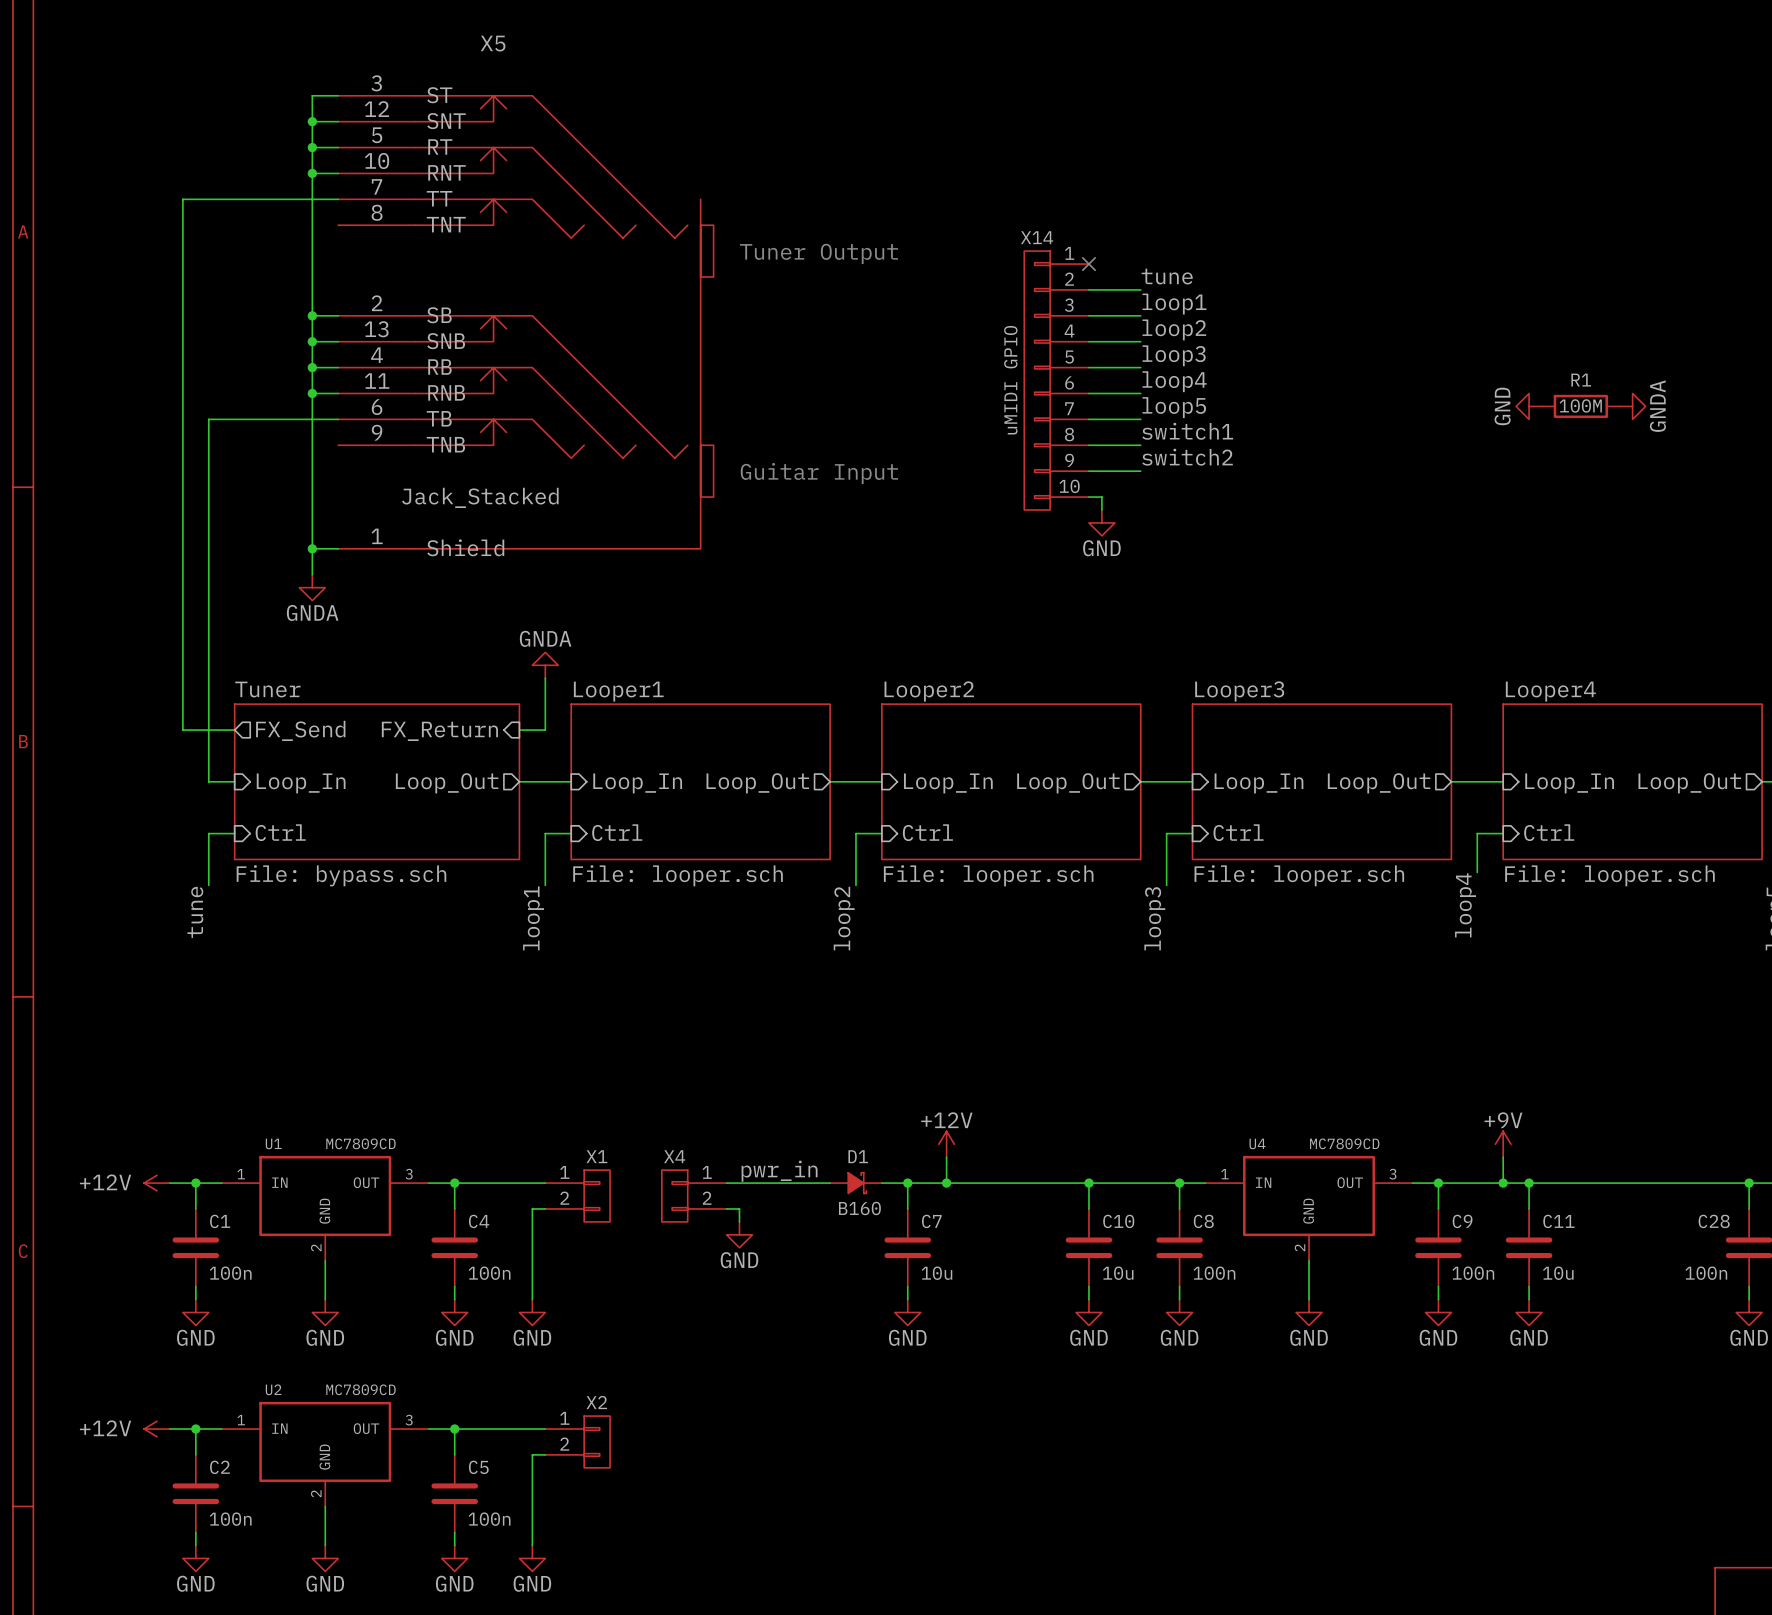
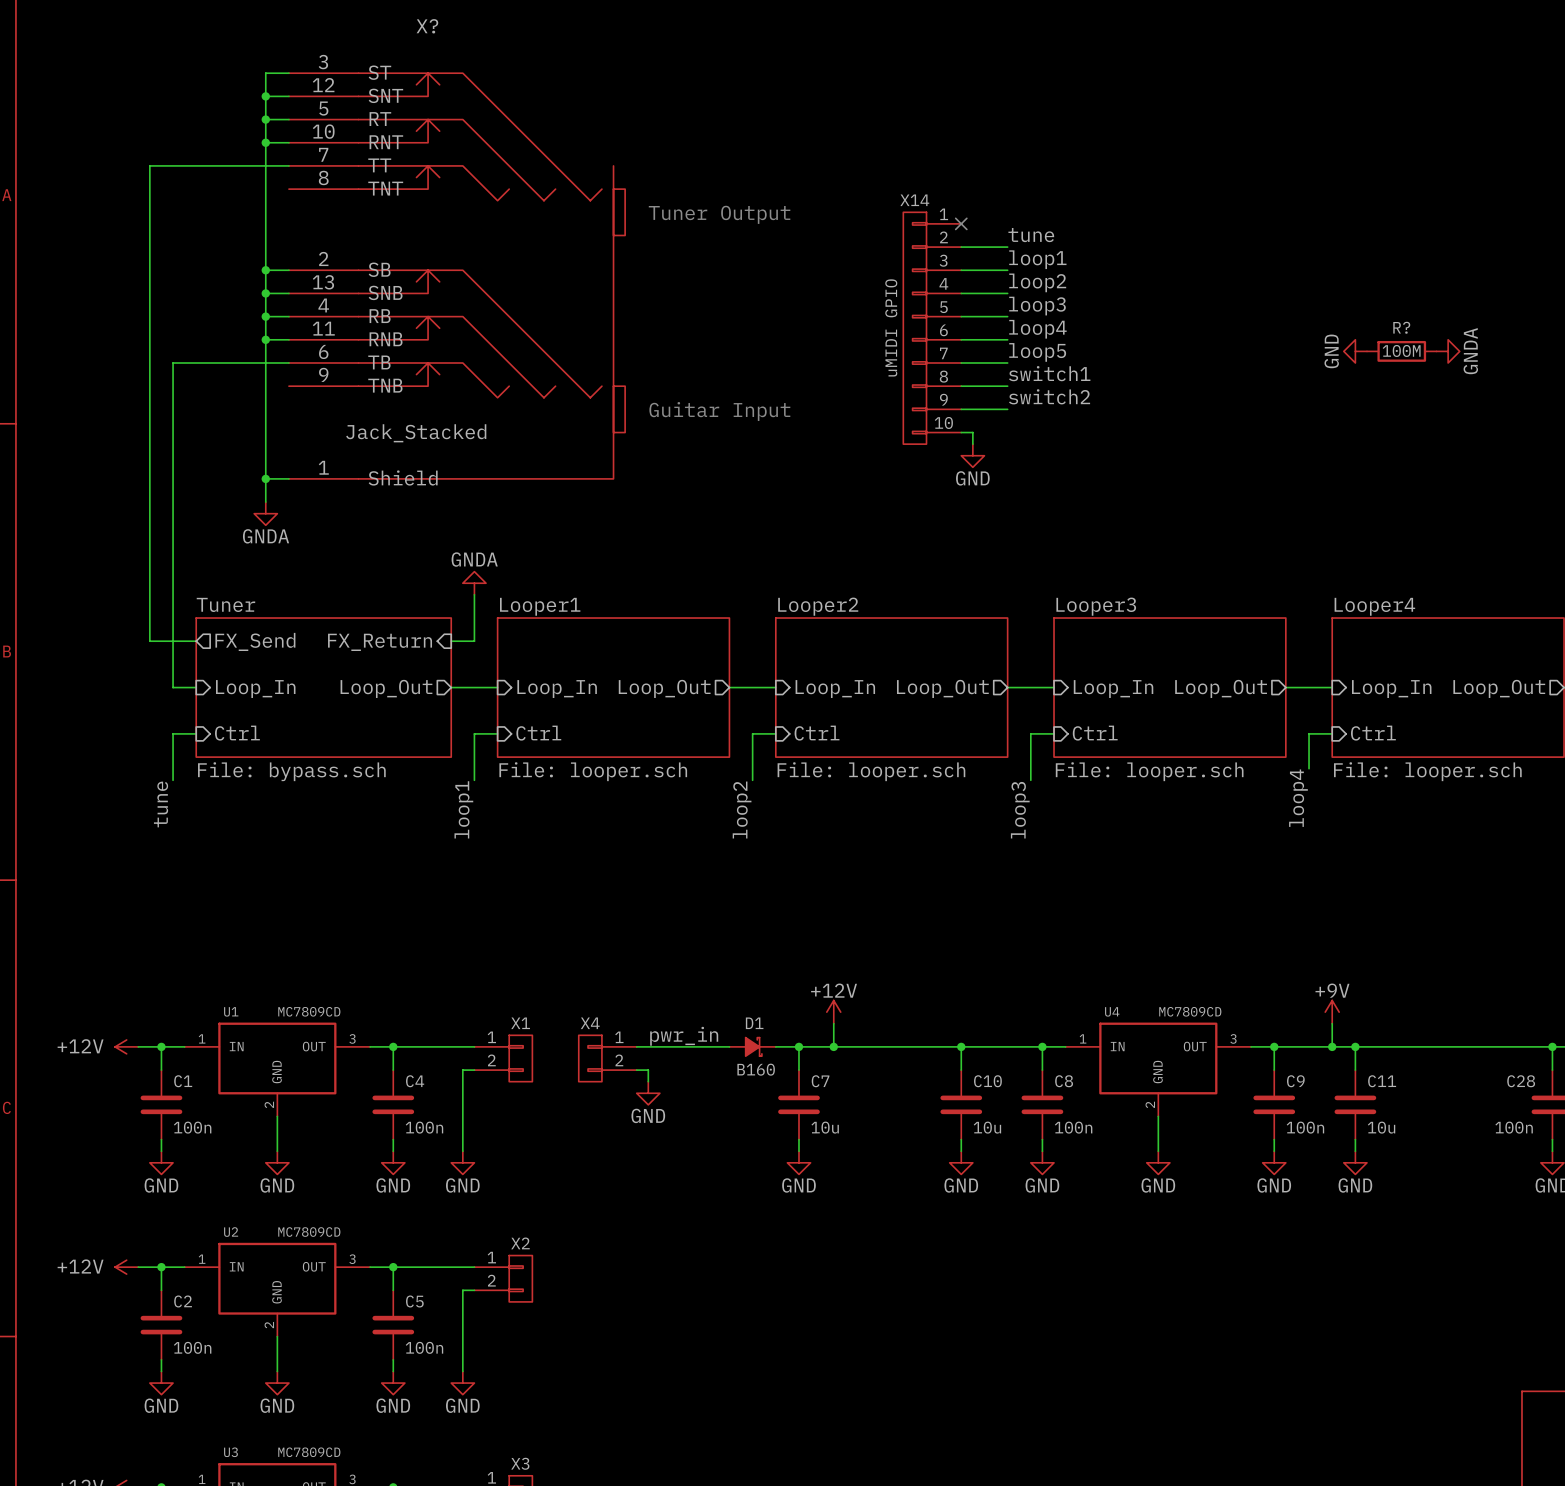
X5 name: X5 (493, 43) -> X? (427, 26)
R1 name: R1 (1581, 380) -> R? (1401, 327)

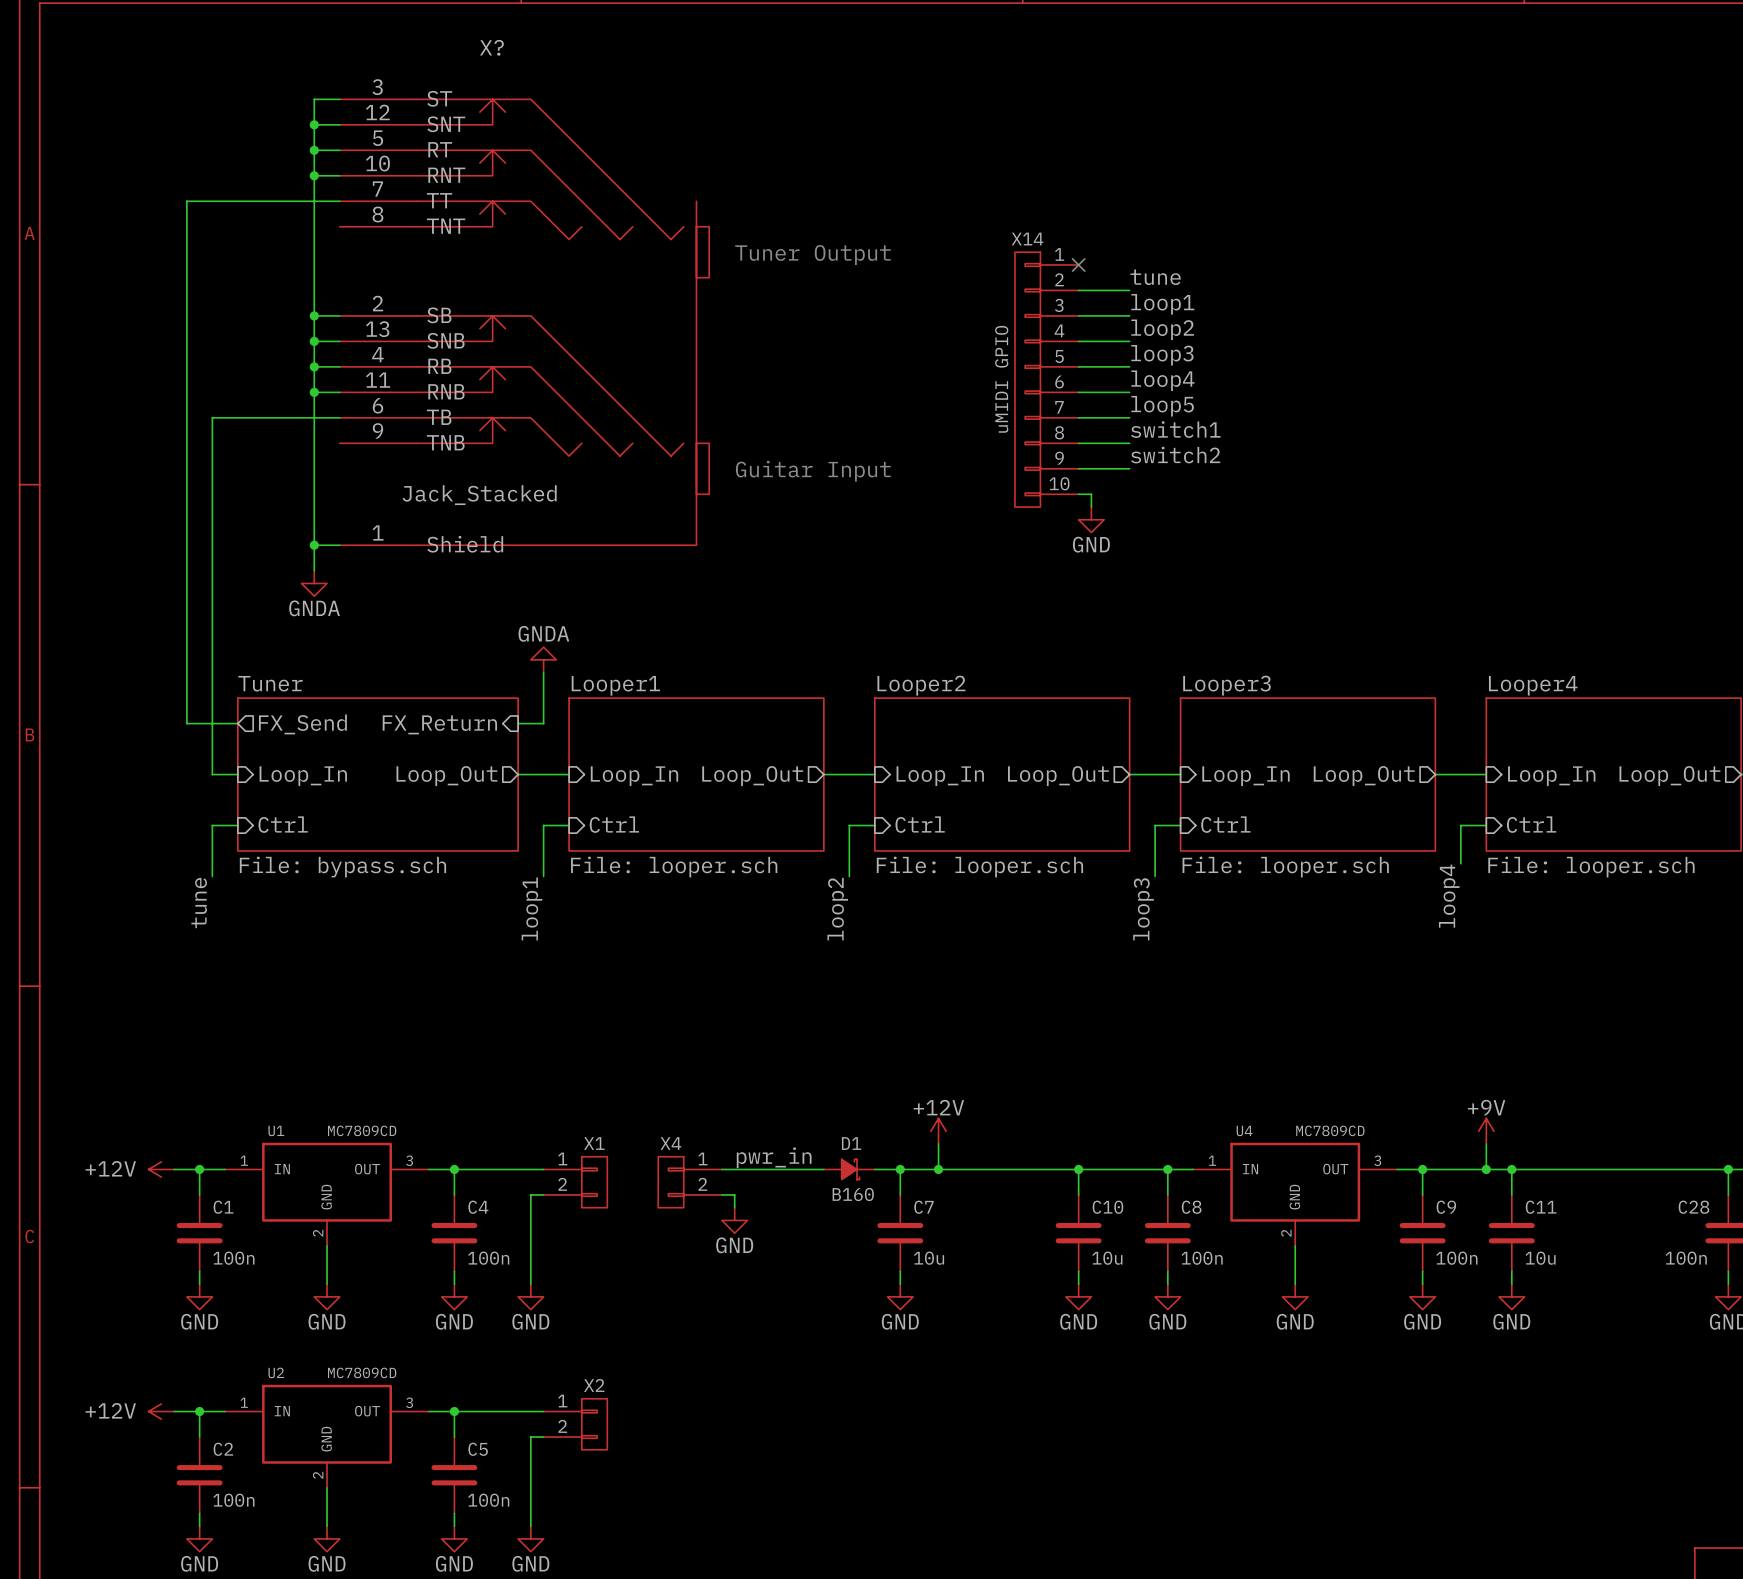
power symbol: GND (1355, 351) -> none
R?: 100M (1401, 351) -> none
power symbol: GNDA (1448, 351) -> none

